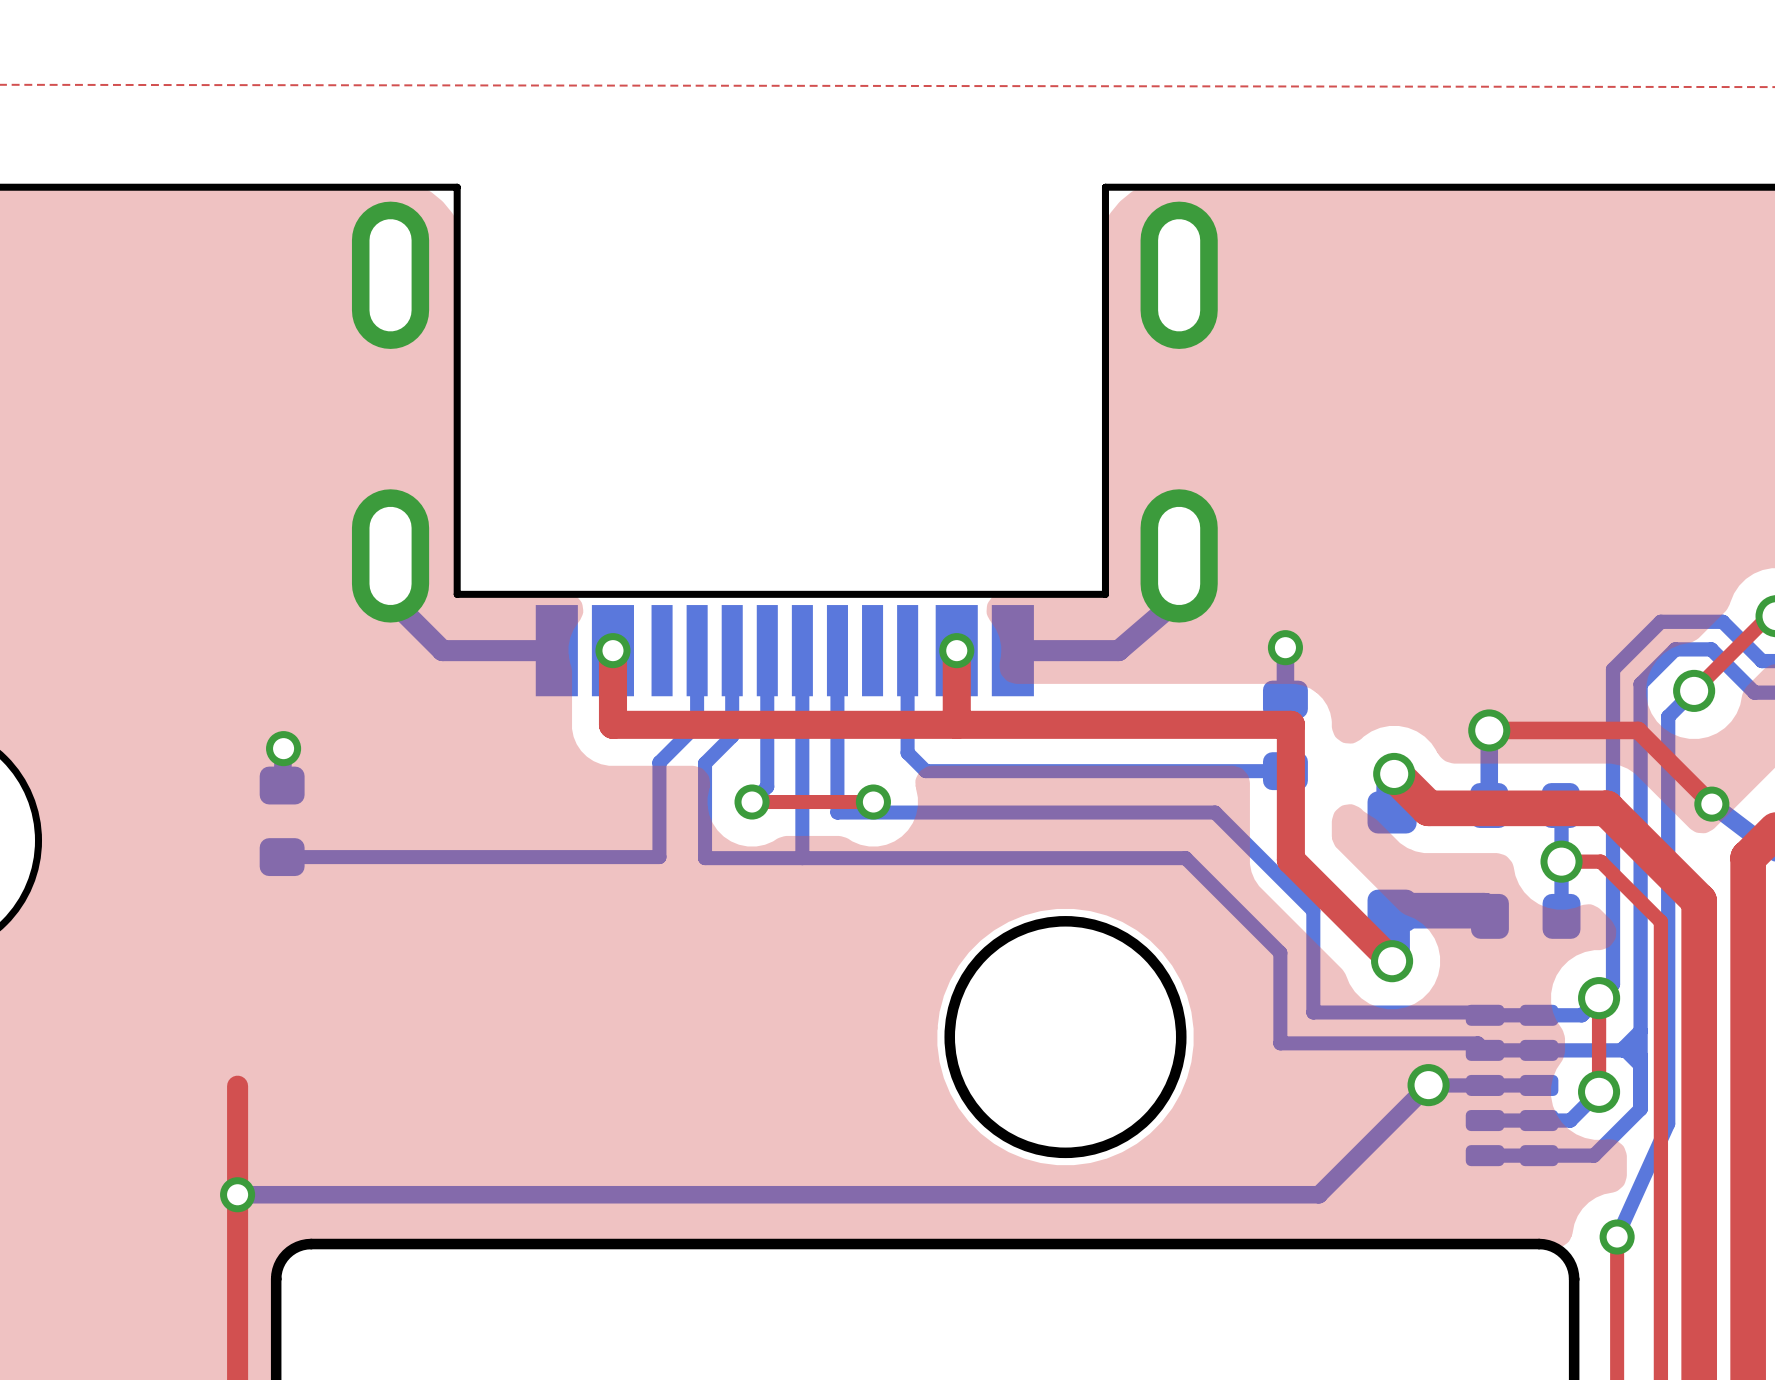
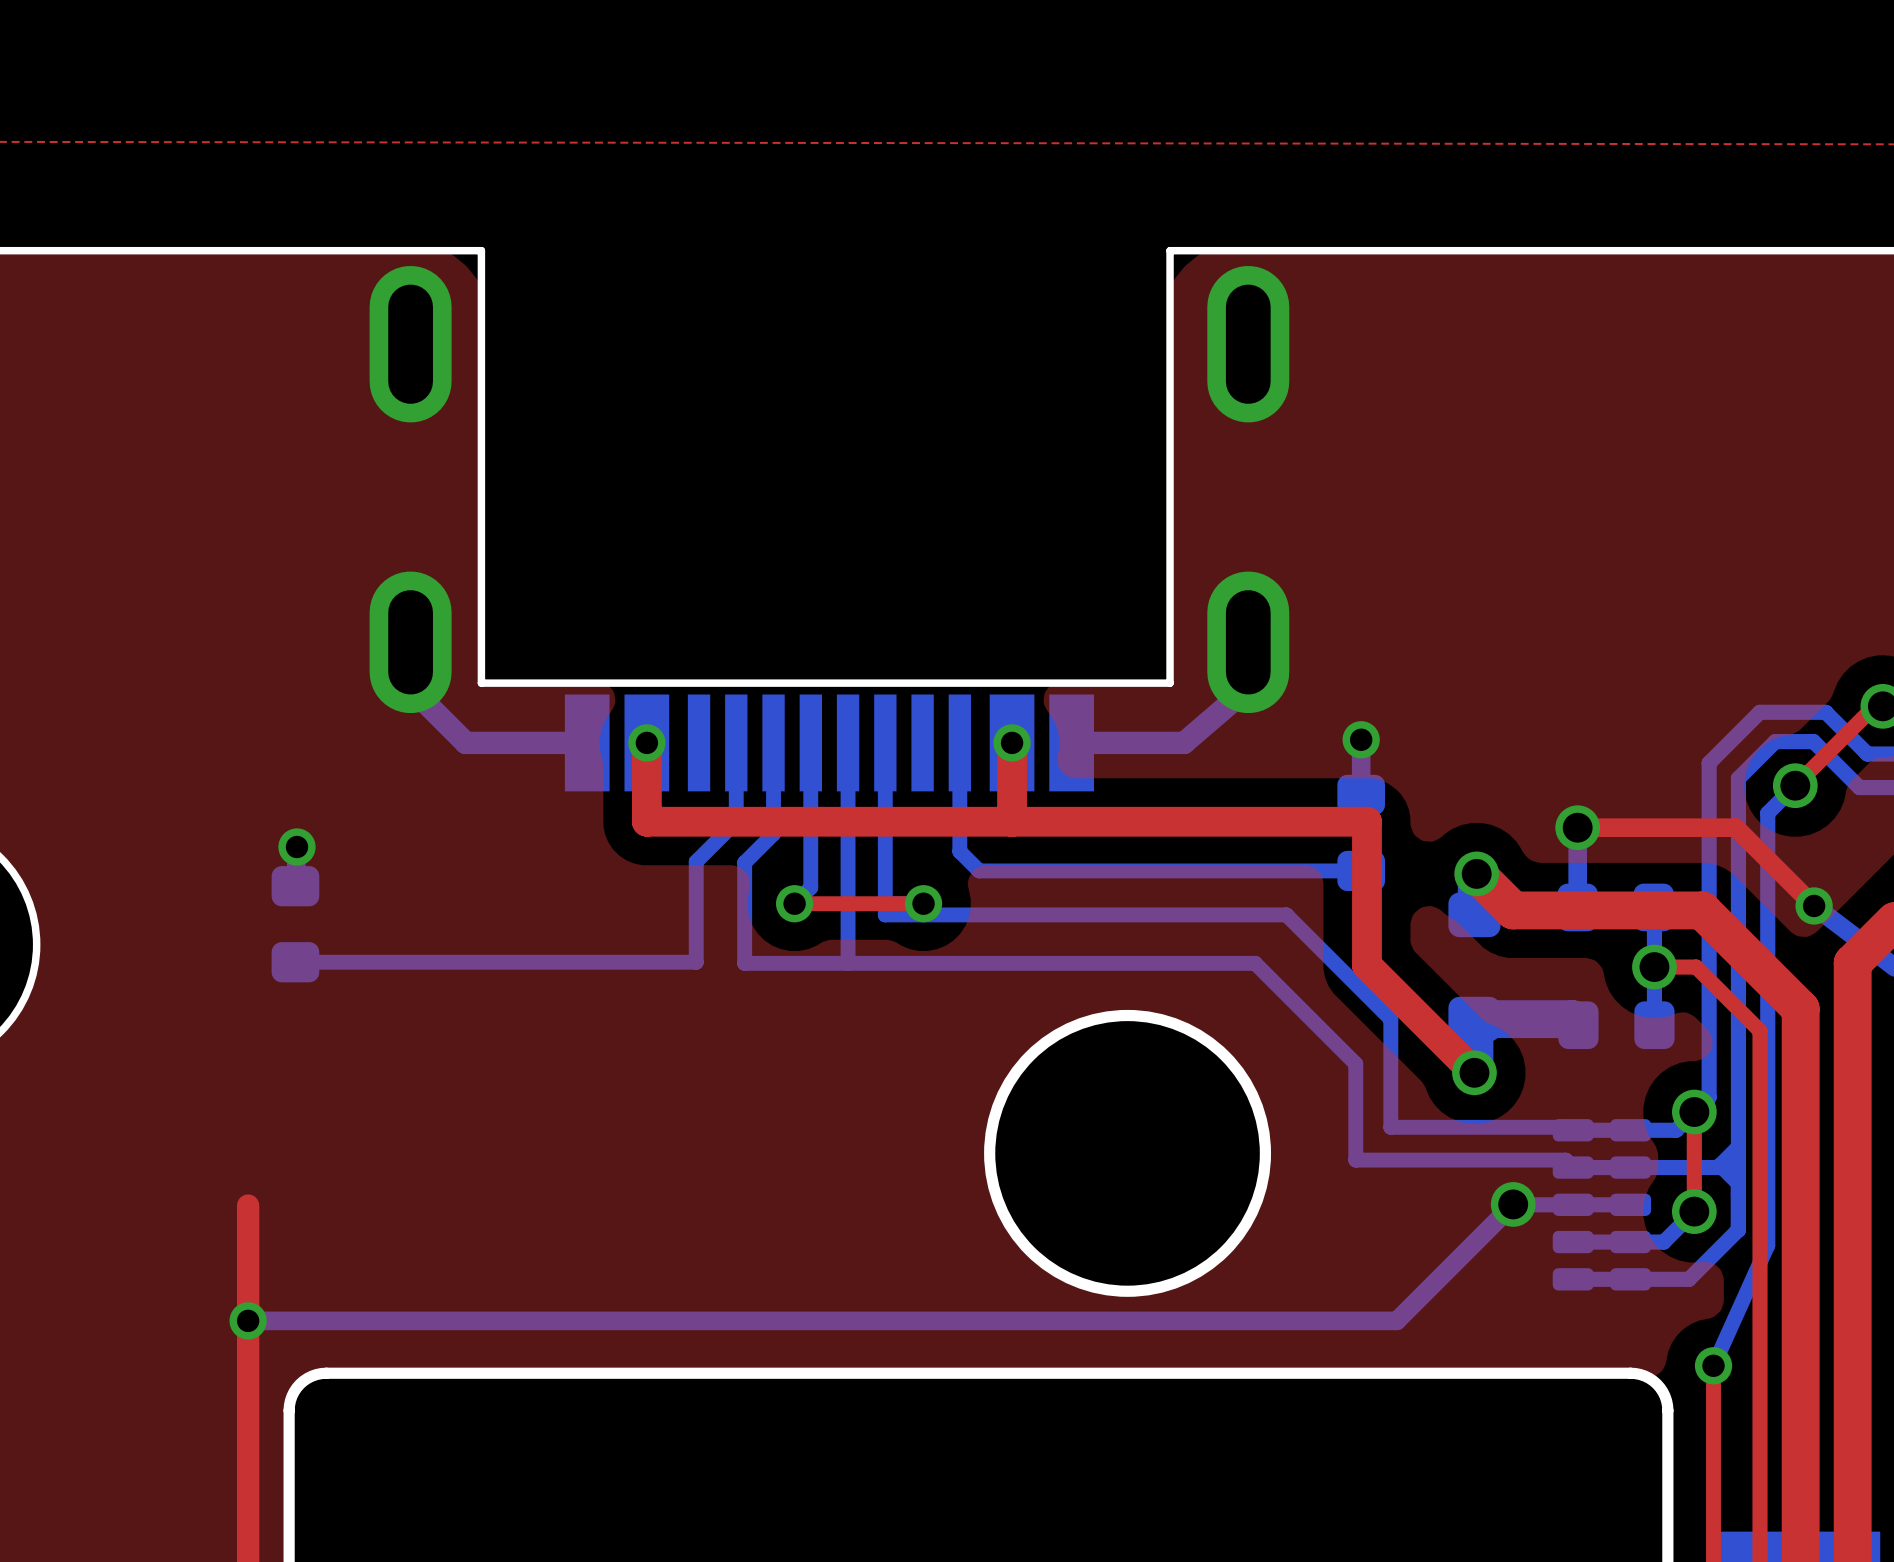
round board edge size: [944, 916, 1187, 1159] -> [984, 1009, 1272, 1297]

